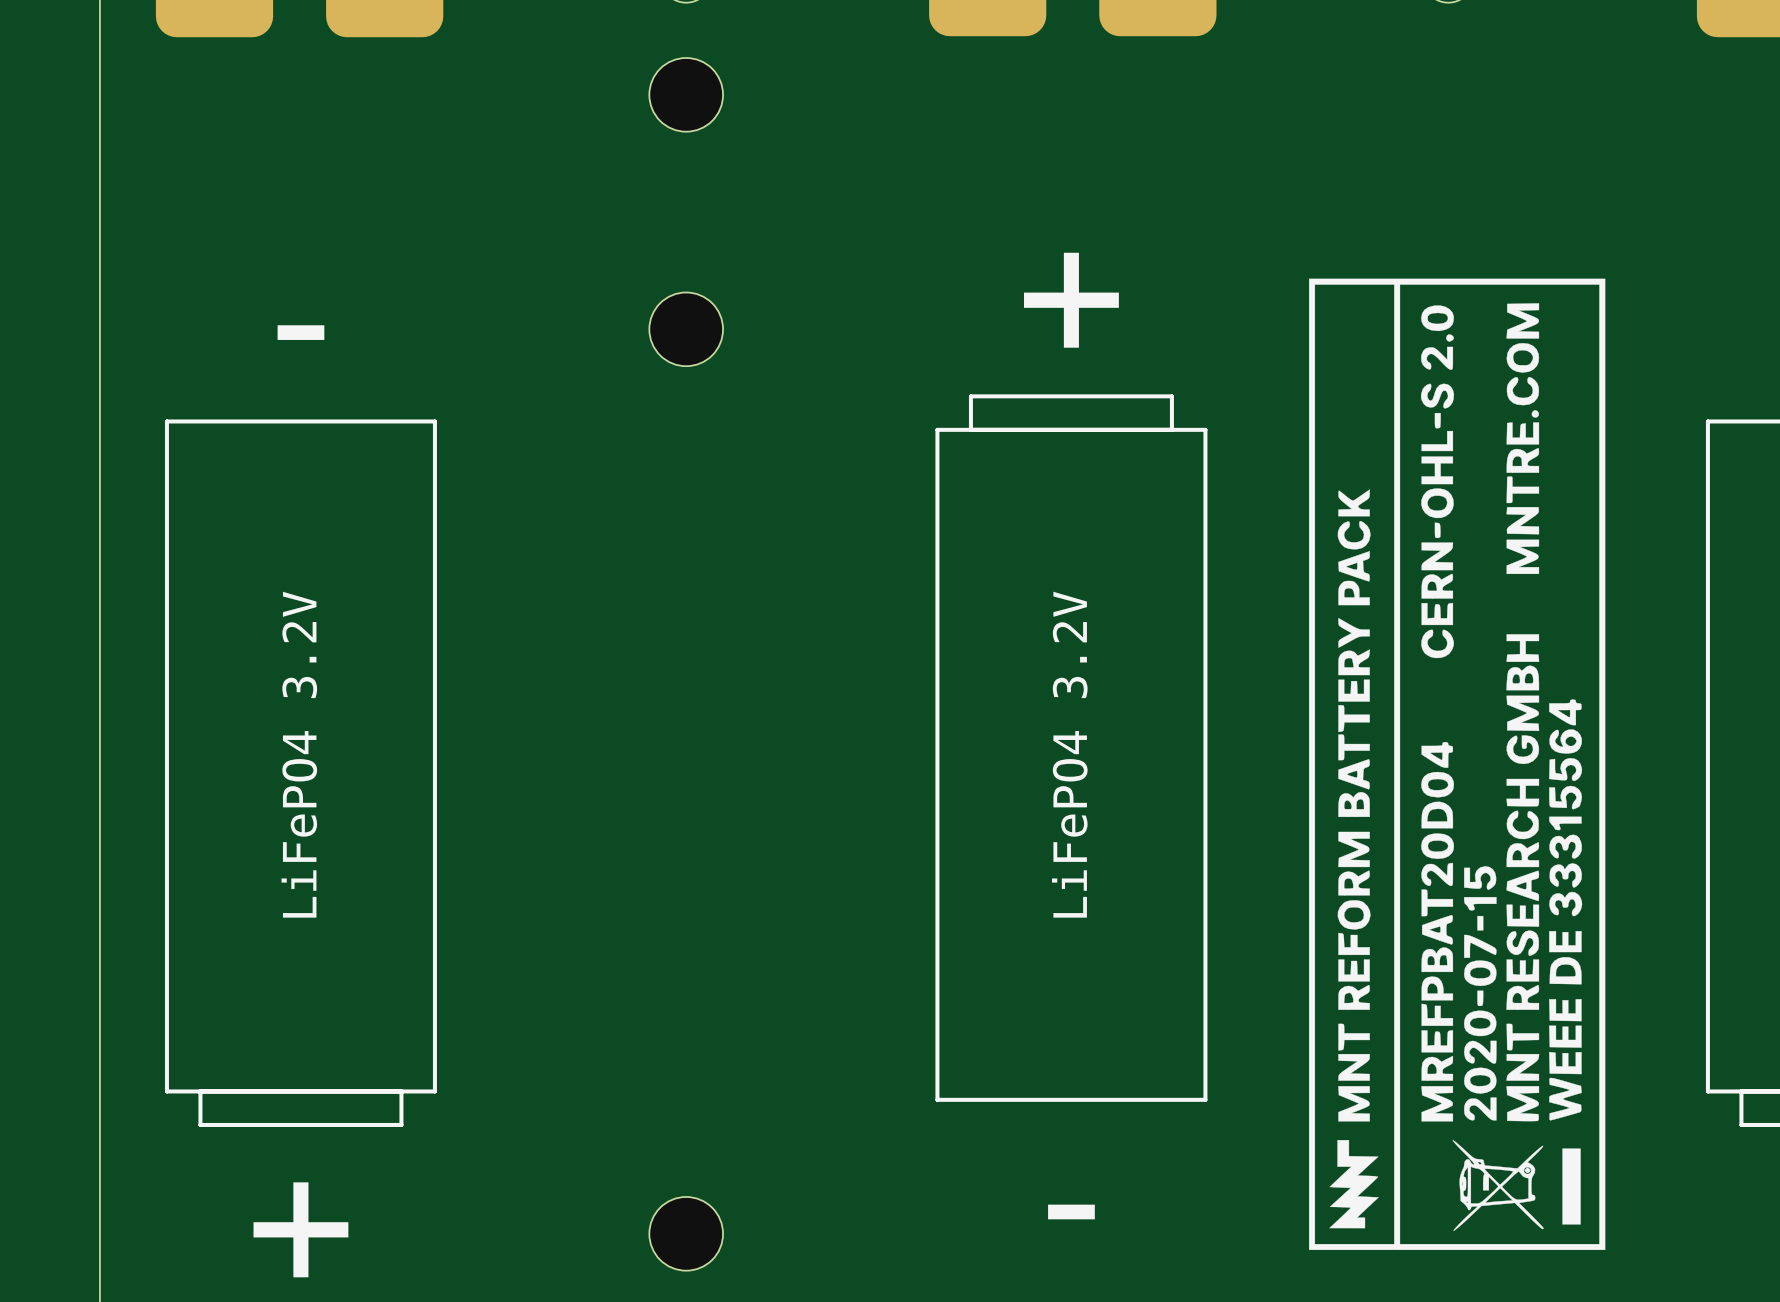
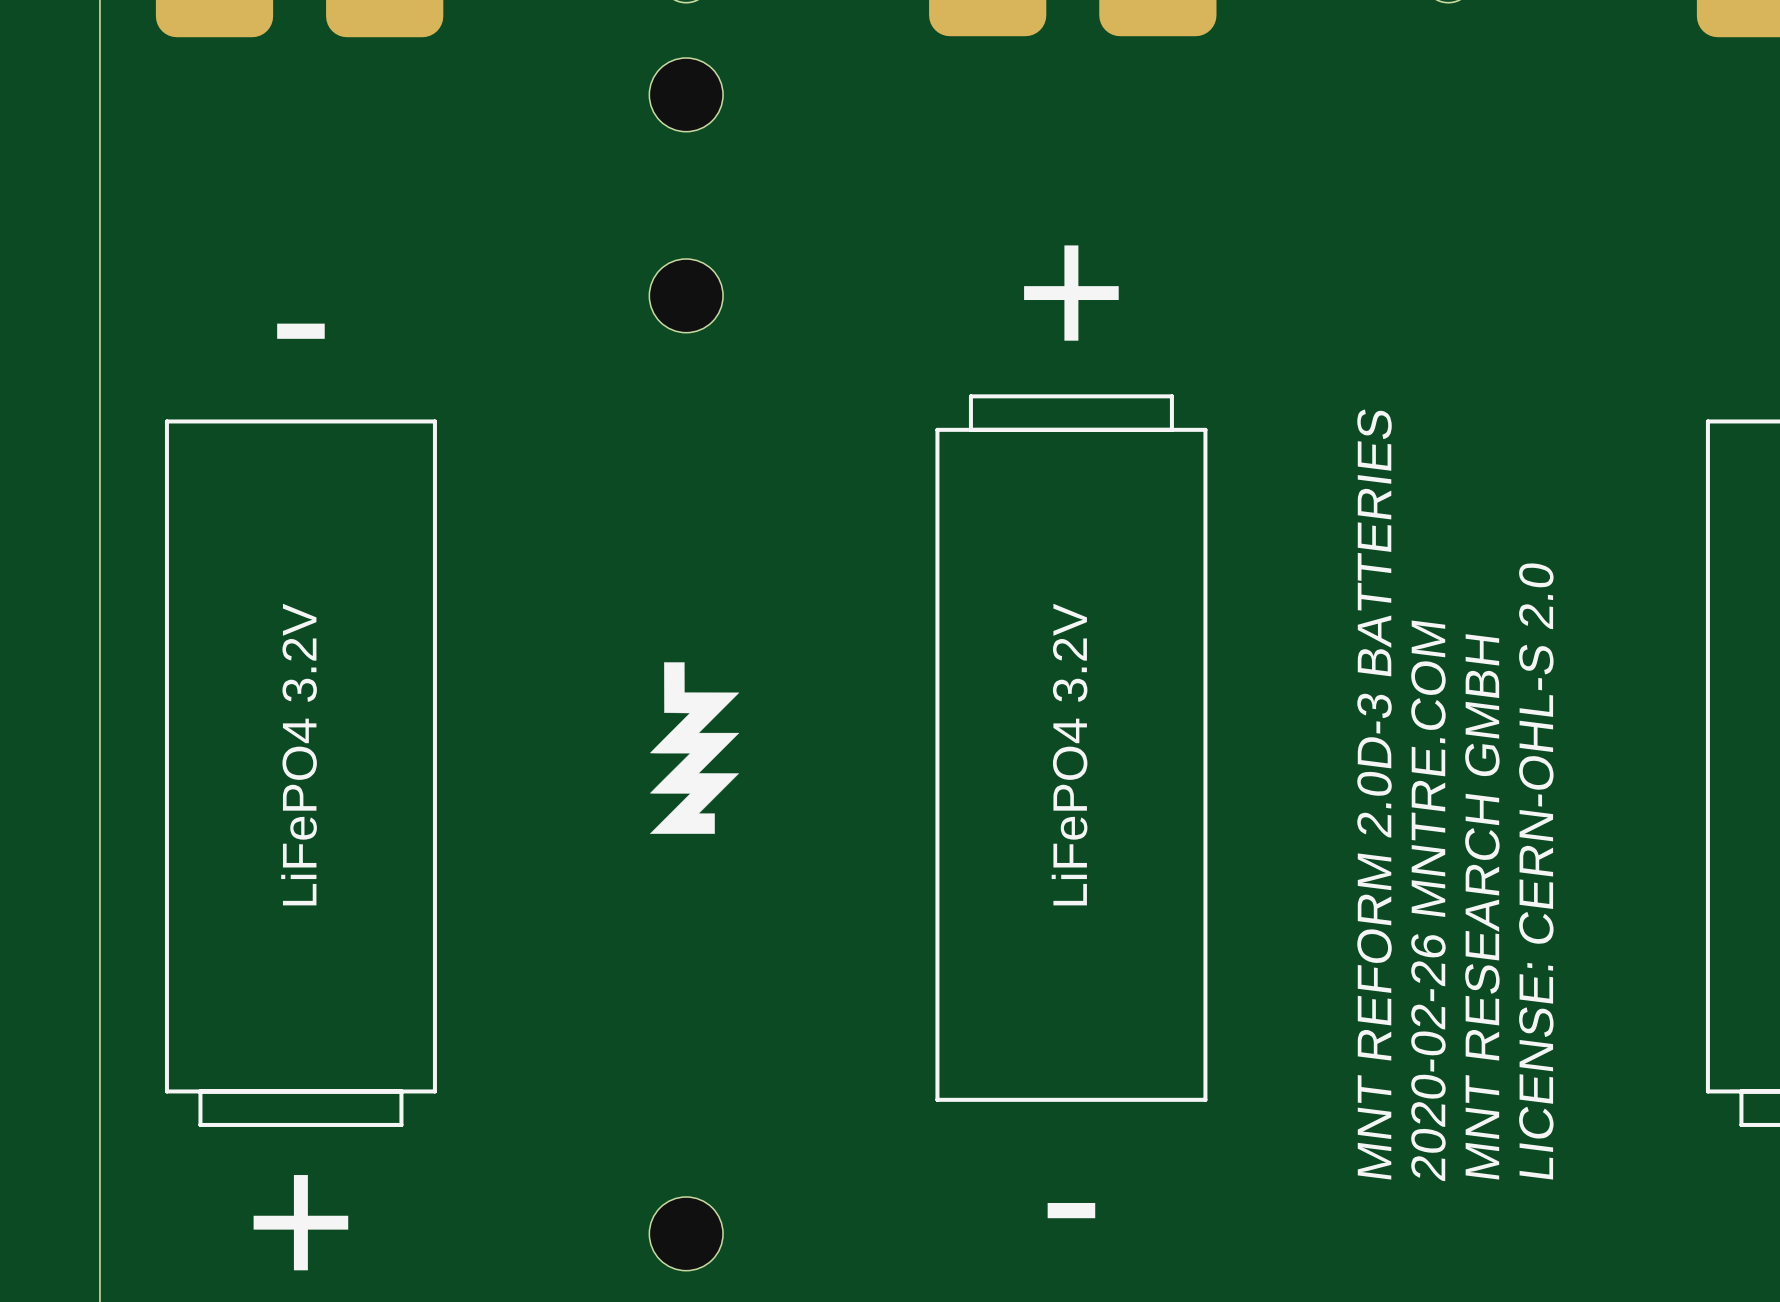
drawing: [1309, 278, 1606, 1251] -> none
part position: (686, 329) -> (686, 295)
drawing: none -> [650, 662, 740, 834]
text: none -> MNT REFORM 2.0D-3 BATTERIES (1374, 794)
text: none -> LICENSE: CERN-OHL-S 2.0 (1536, 871)
text: none -> 2020-02-26 MNTRE.COM (1428, 900)
text: none -> MNT RESEARCH GMBH (1482, 906)

